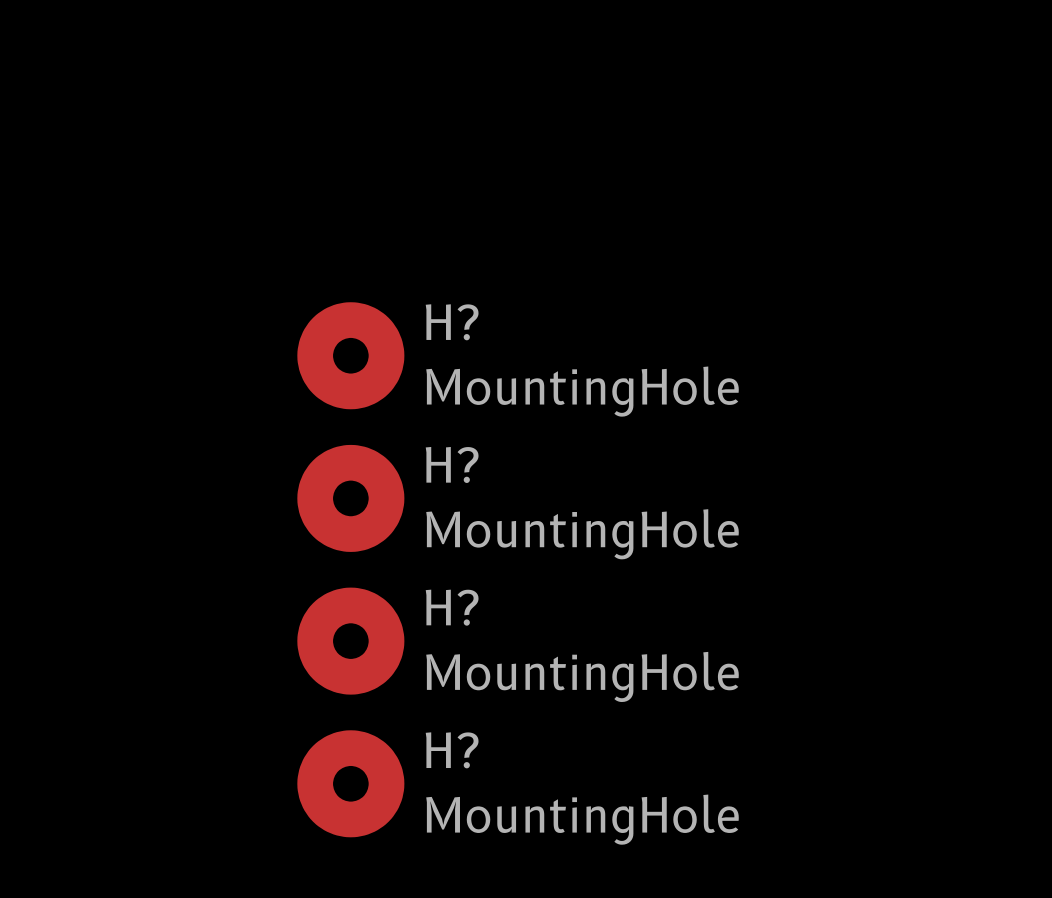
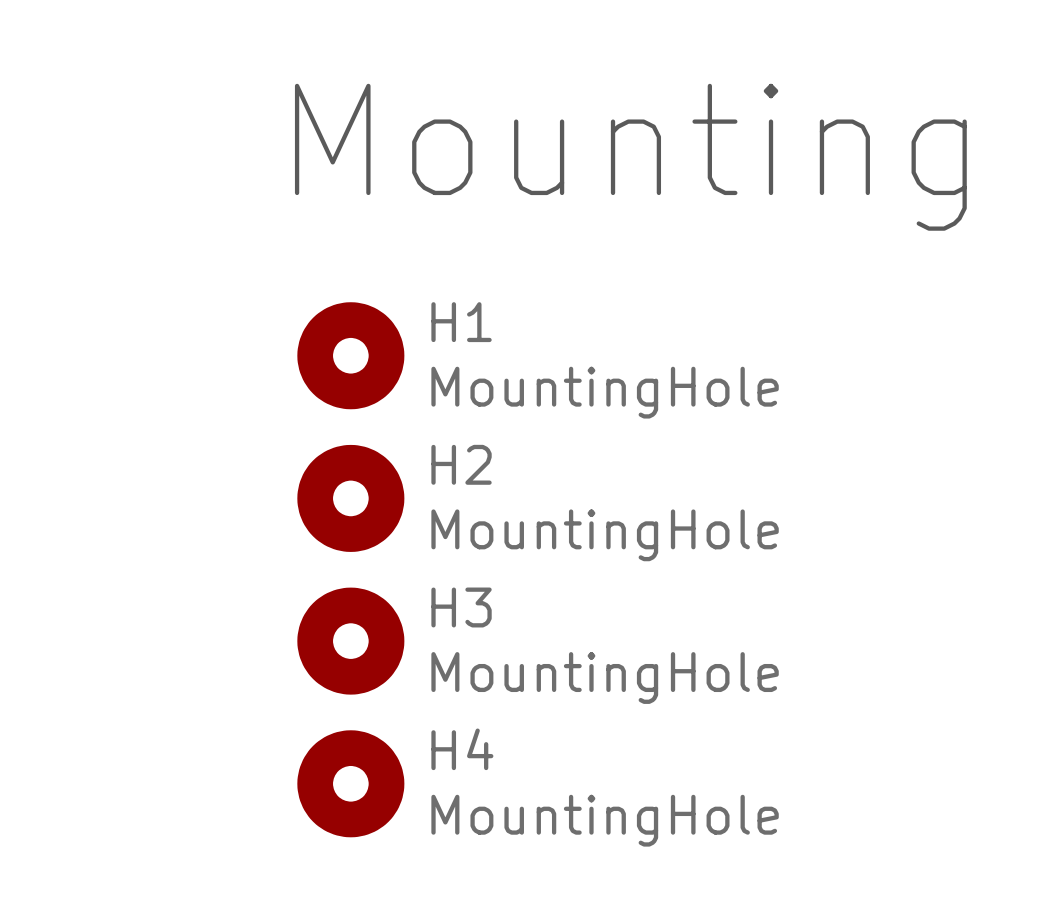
text: none -> Mounting (630, 157)
H? name: H? (452, 322) -> H1 (461, 322)
H? name: H? (452, 464) -> H2 (461, 464)
H? name: H? (452, 607) -> H3 (461, 607)
H? name: H? (452, 750) -> H4 (462, 749)

